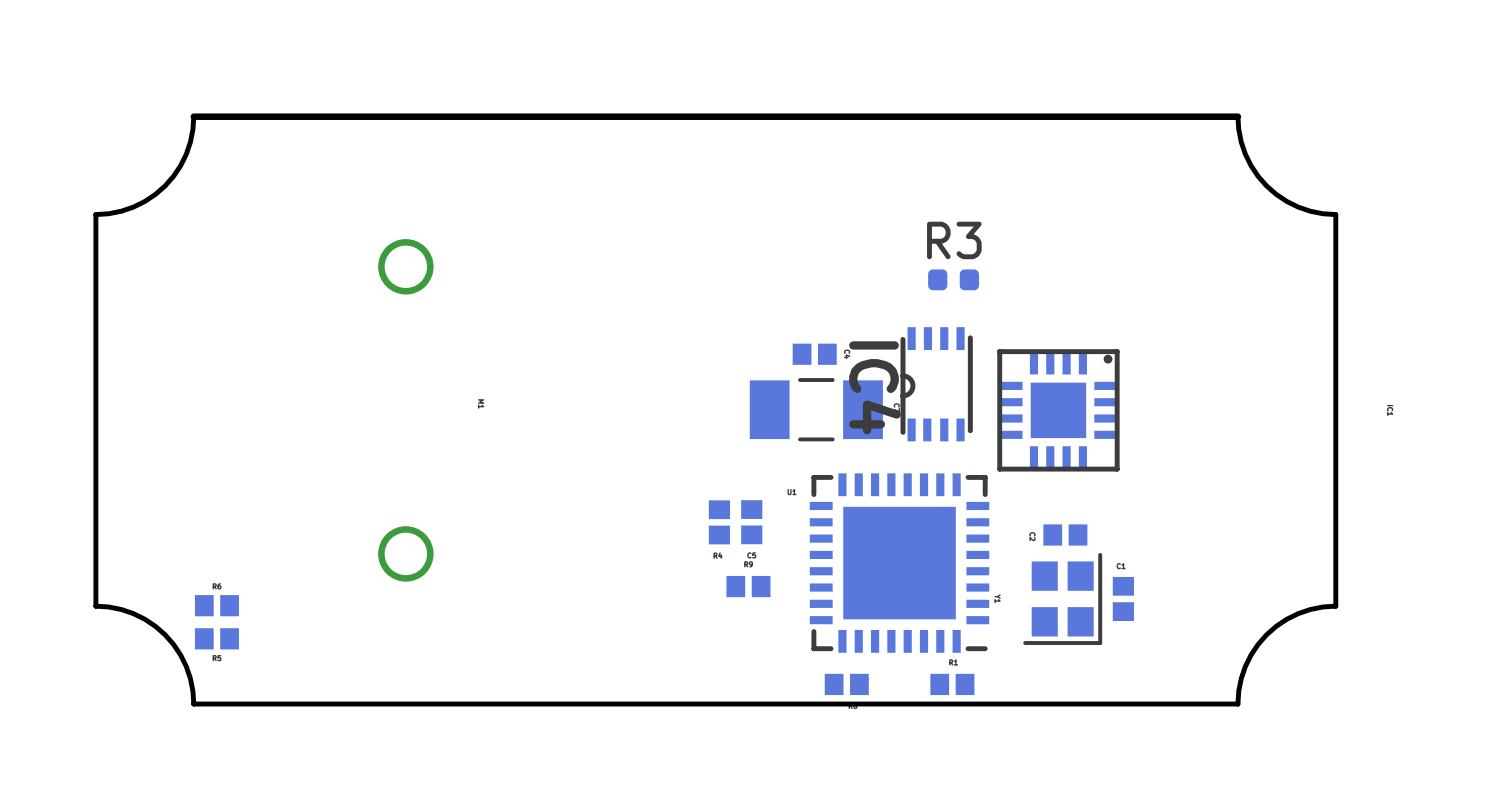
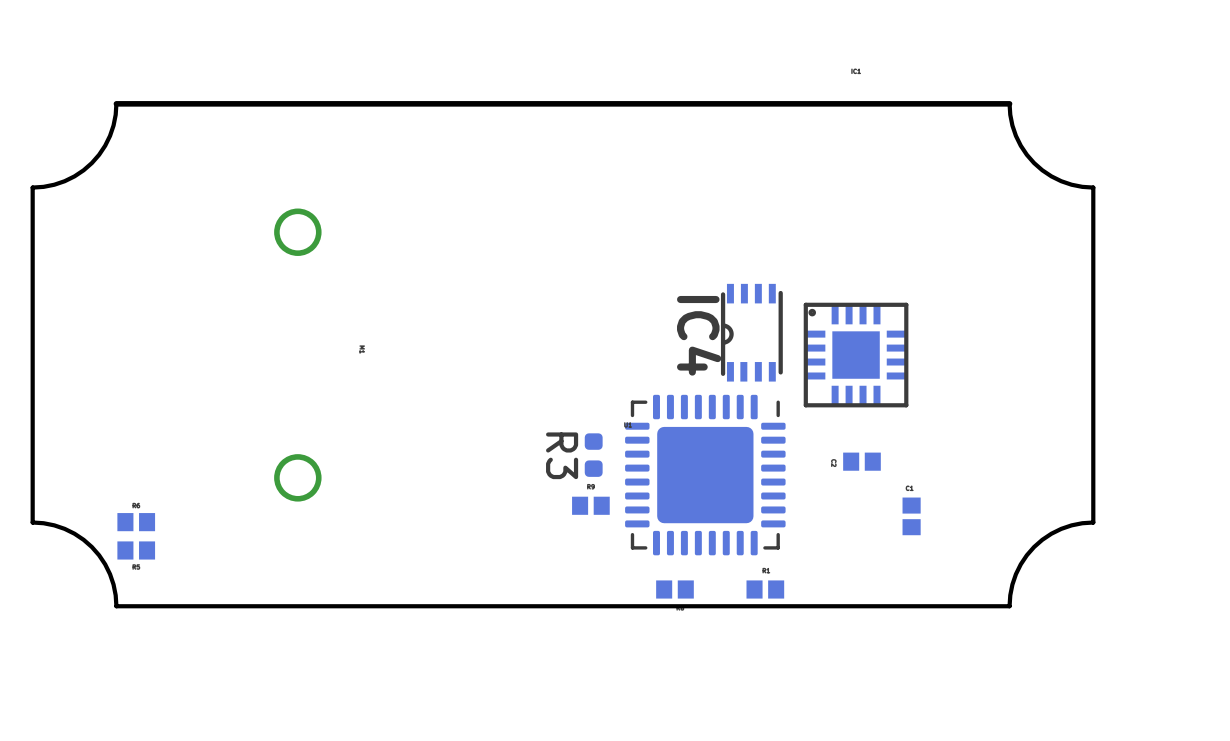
R3 rotation: 0° (953, 279) -> 90° clockwise (593, 455)
R3 position: (953, 279) -> (593, 455)
part: (814, 354) -> none
part: (816, 409) -> none
part rotation: 0° (1058, 410) -> 90° counterclockwise (856, 355)
part footprint: [809, 473, 990, 653] -> [625, 394, 786, 556]
part: (719, 522) -> none
part: (751, 522) -> none
part: (1062, 598) -> none

